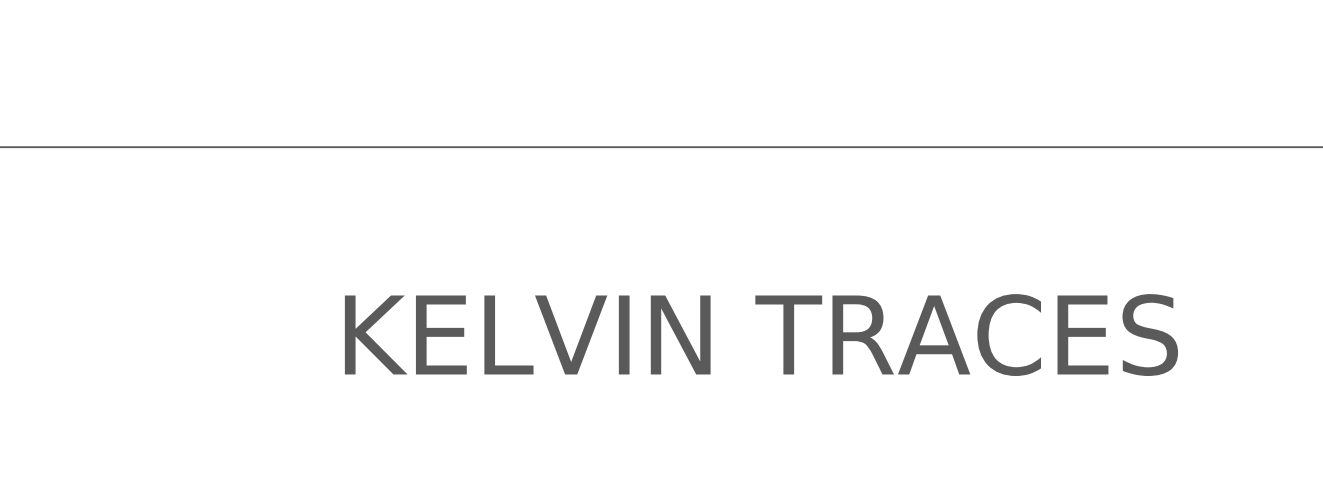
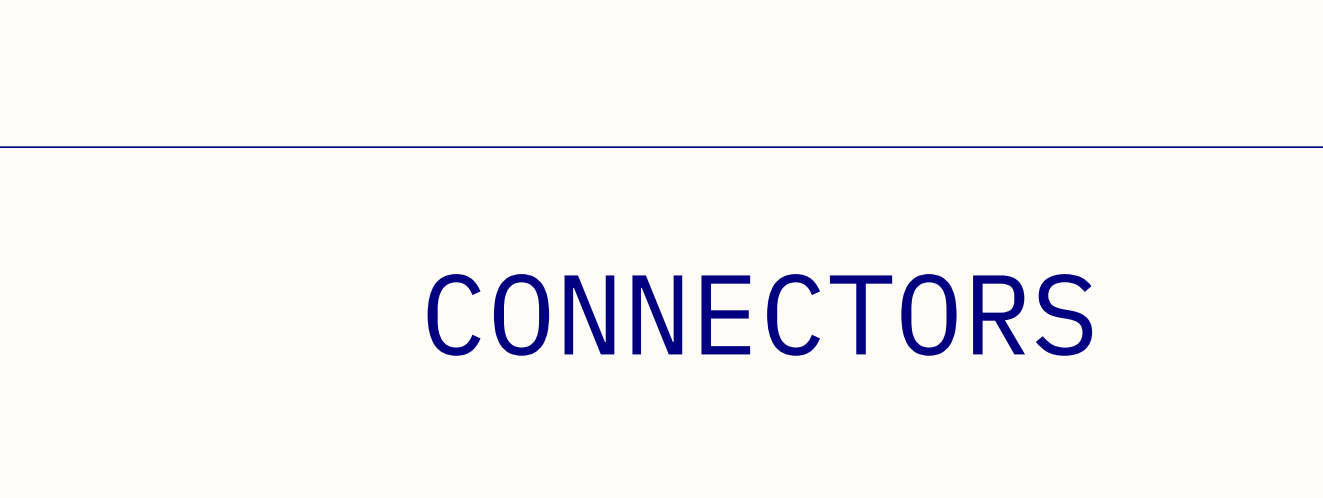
text: KELVIN TRACES (761, 335) -> CONNECTORS (759, 314)

